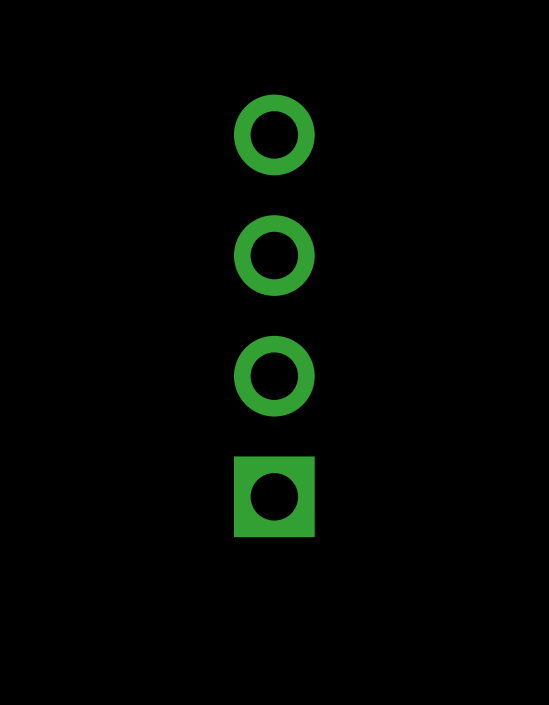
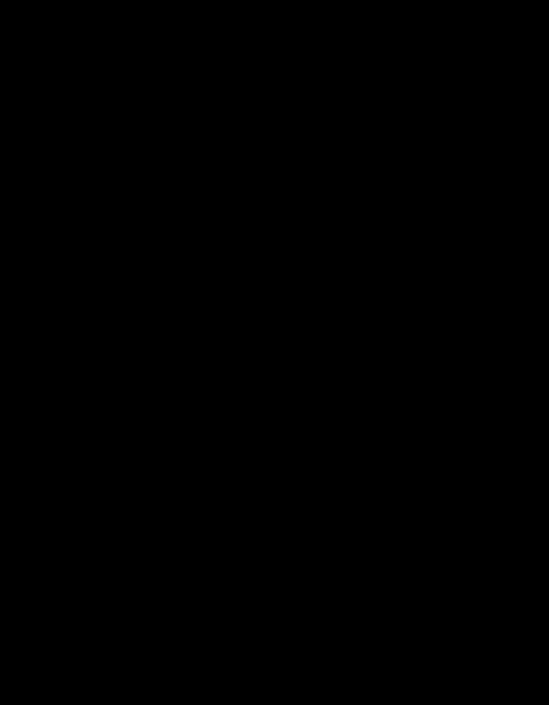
part: (274, 315) -> none

